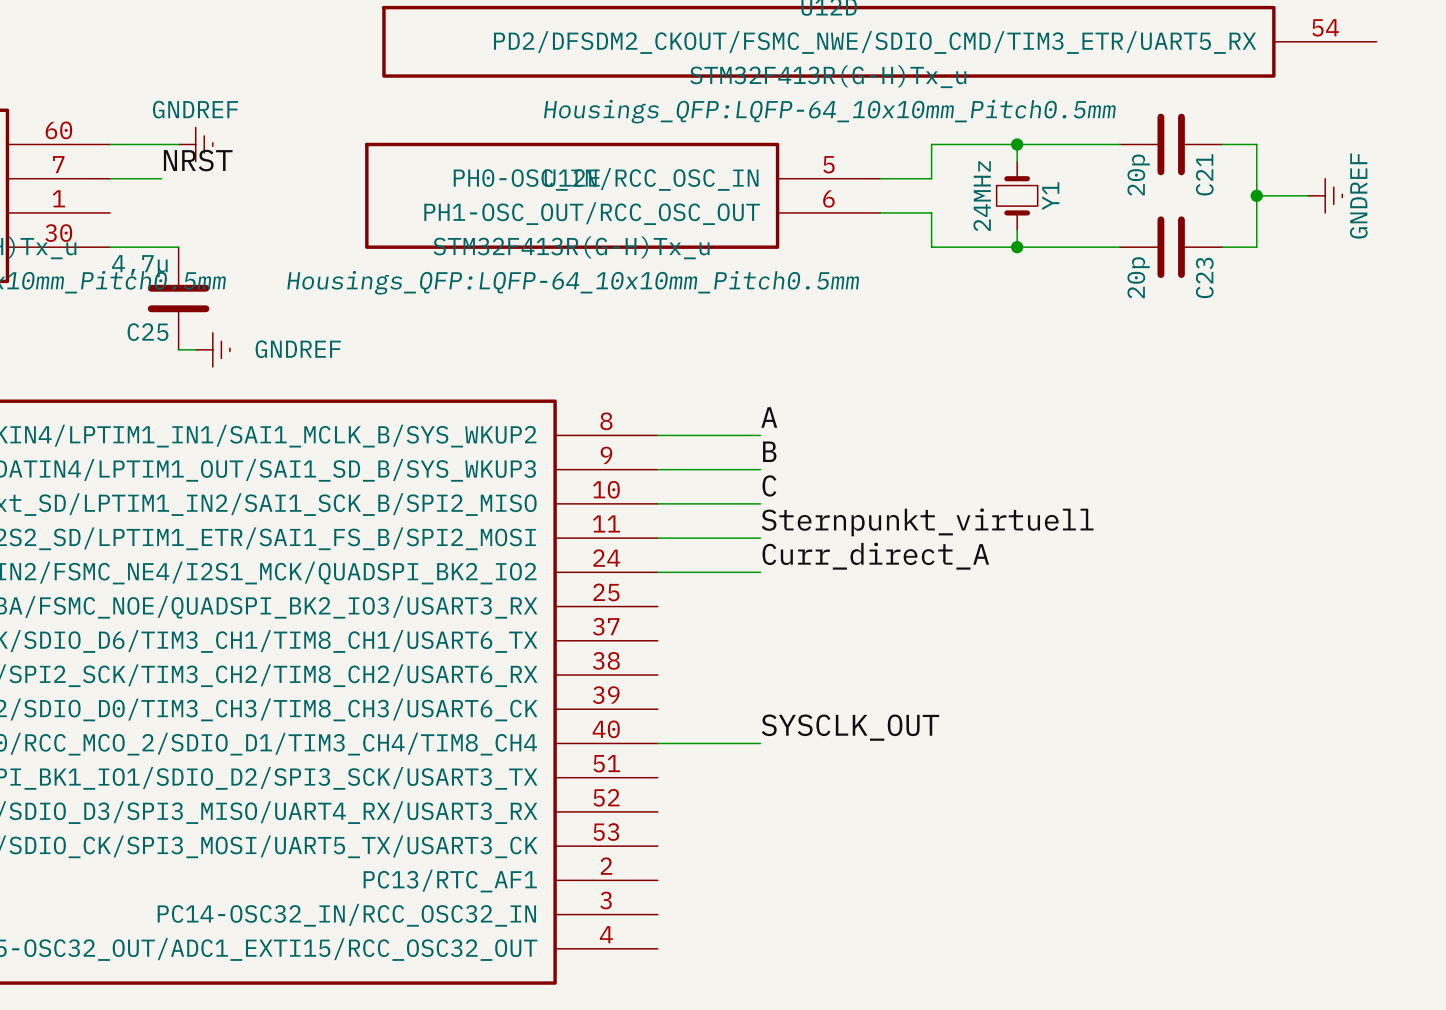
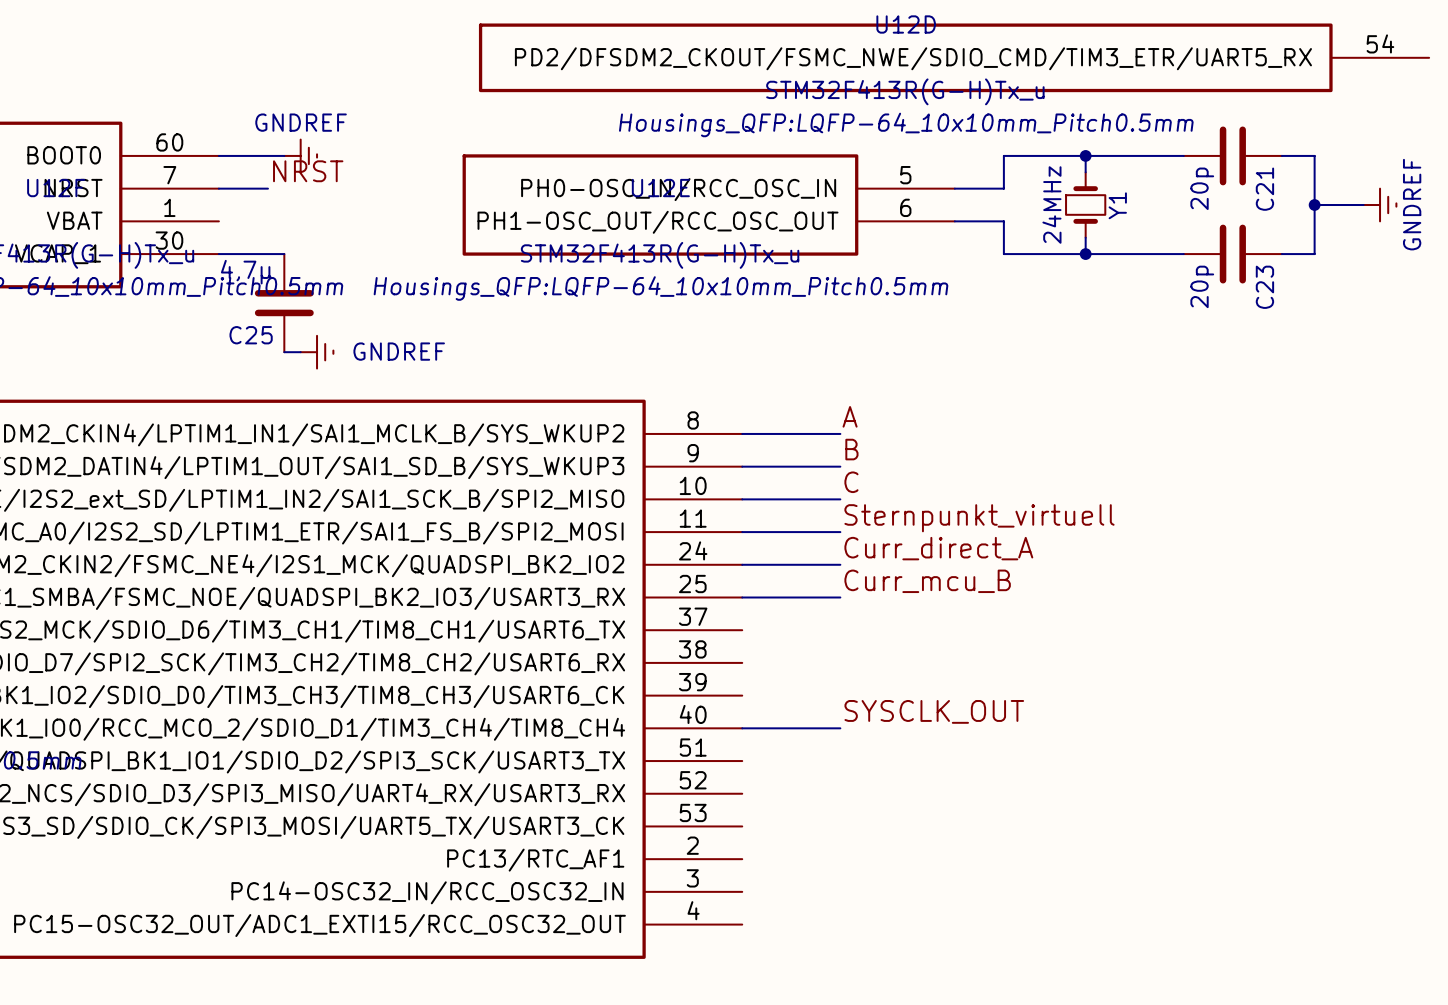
label: none -> Curr_mcu_B (927, 581)
wire: none -> (742, 597) (840, 597)

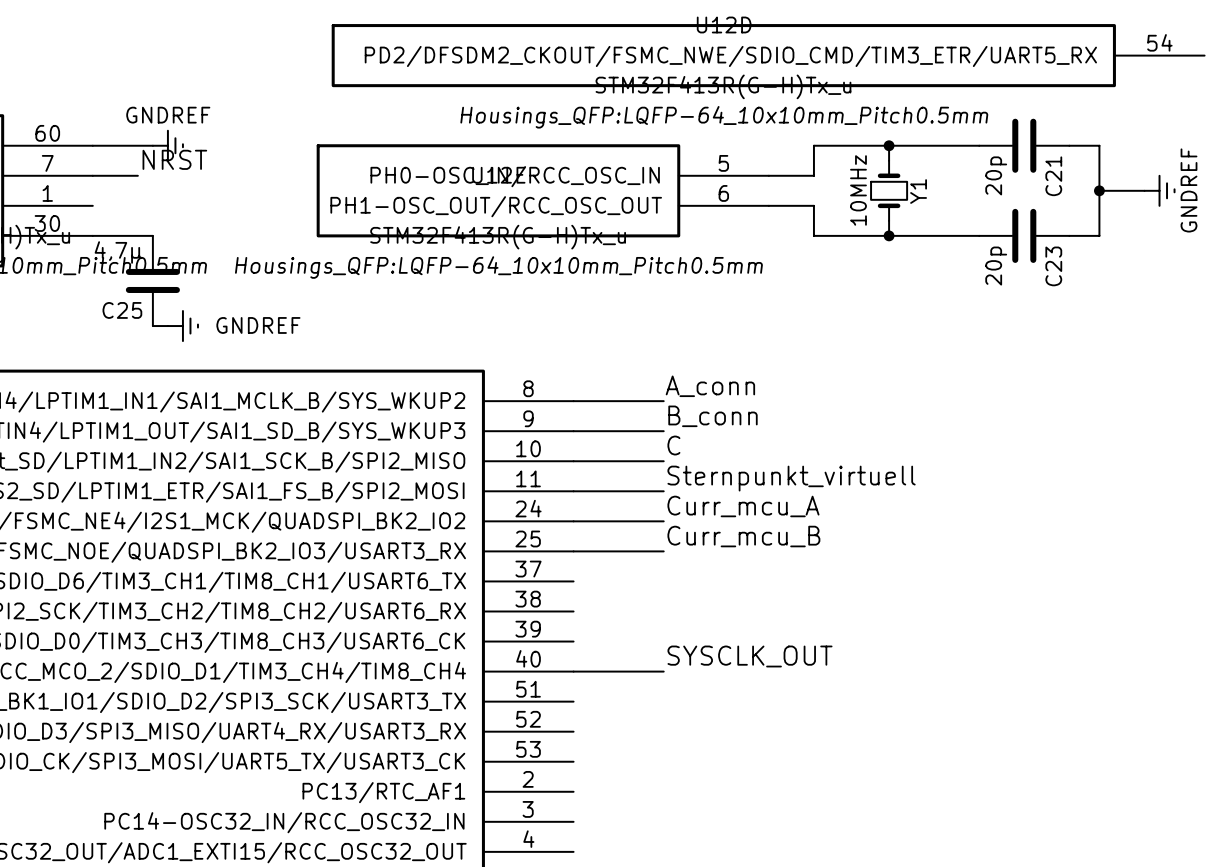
Y1 value: 24MHz (1051, 205) -> 10MHz (858, 190)
label: A (850, 416) -> A_conn (710, 386)
label: B (851, 449) -> B_conn (712, 416)
label: Curr_direct_A (938, 548) -> Curr_mcu_A (743, 506)

